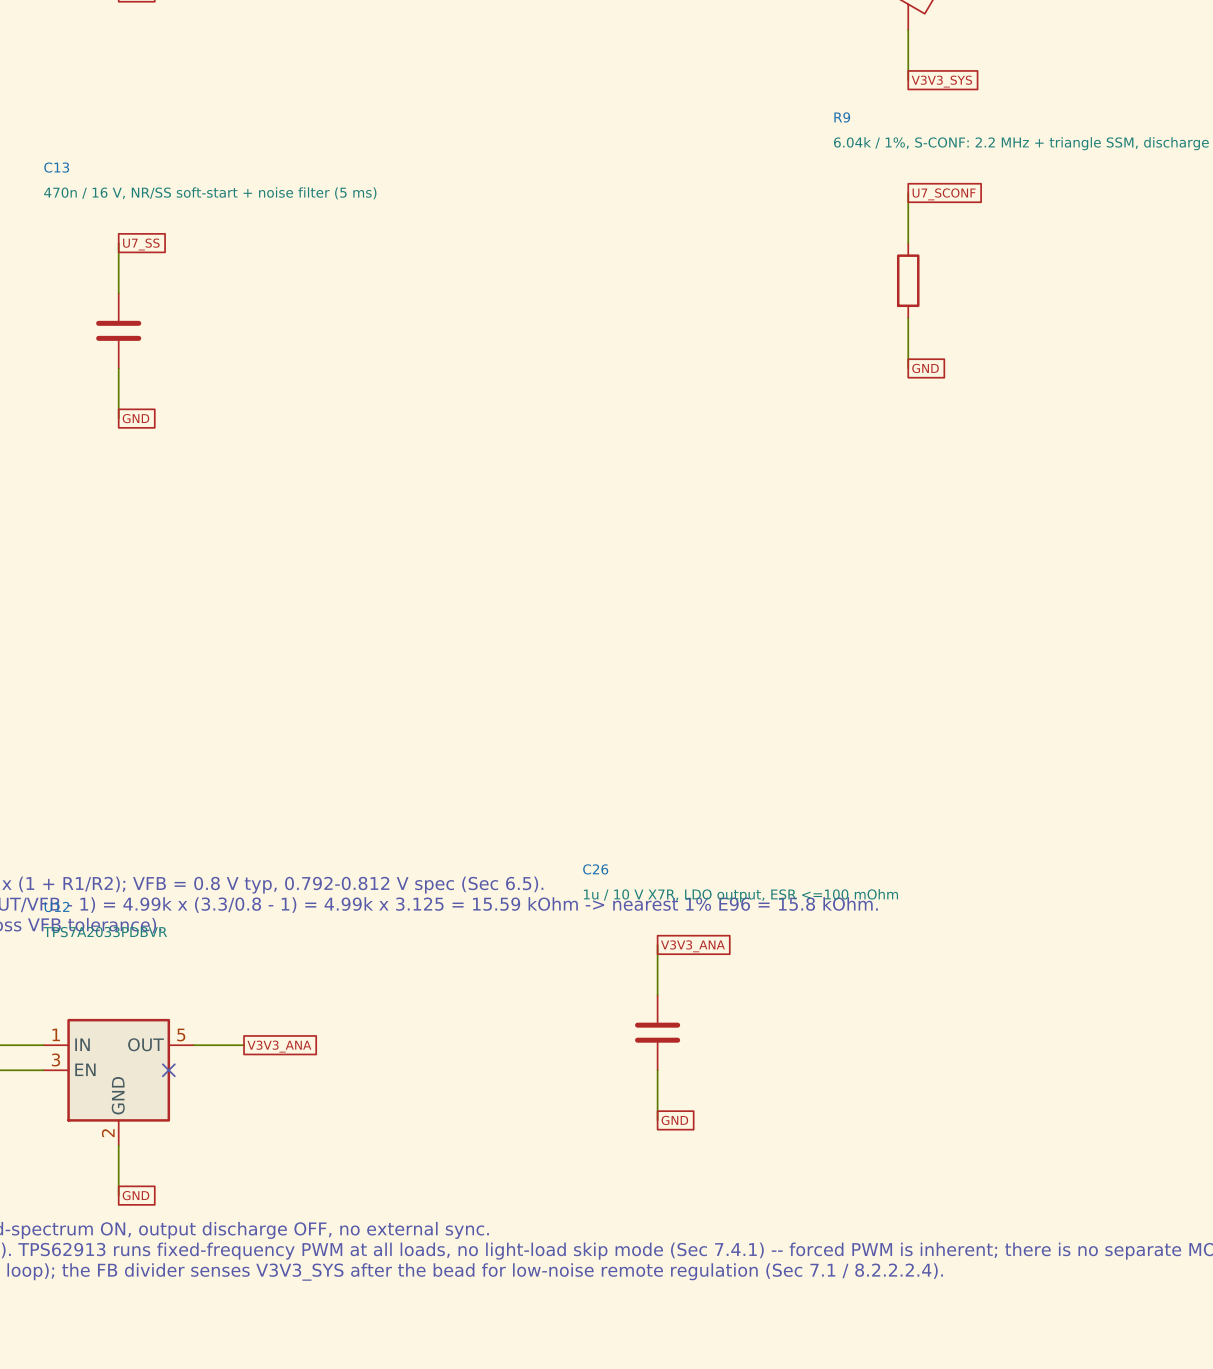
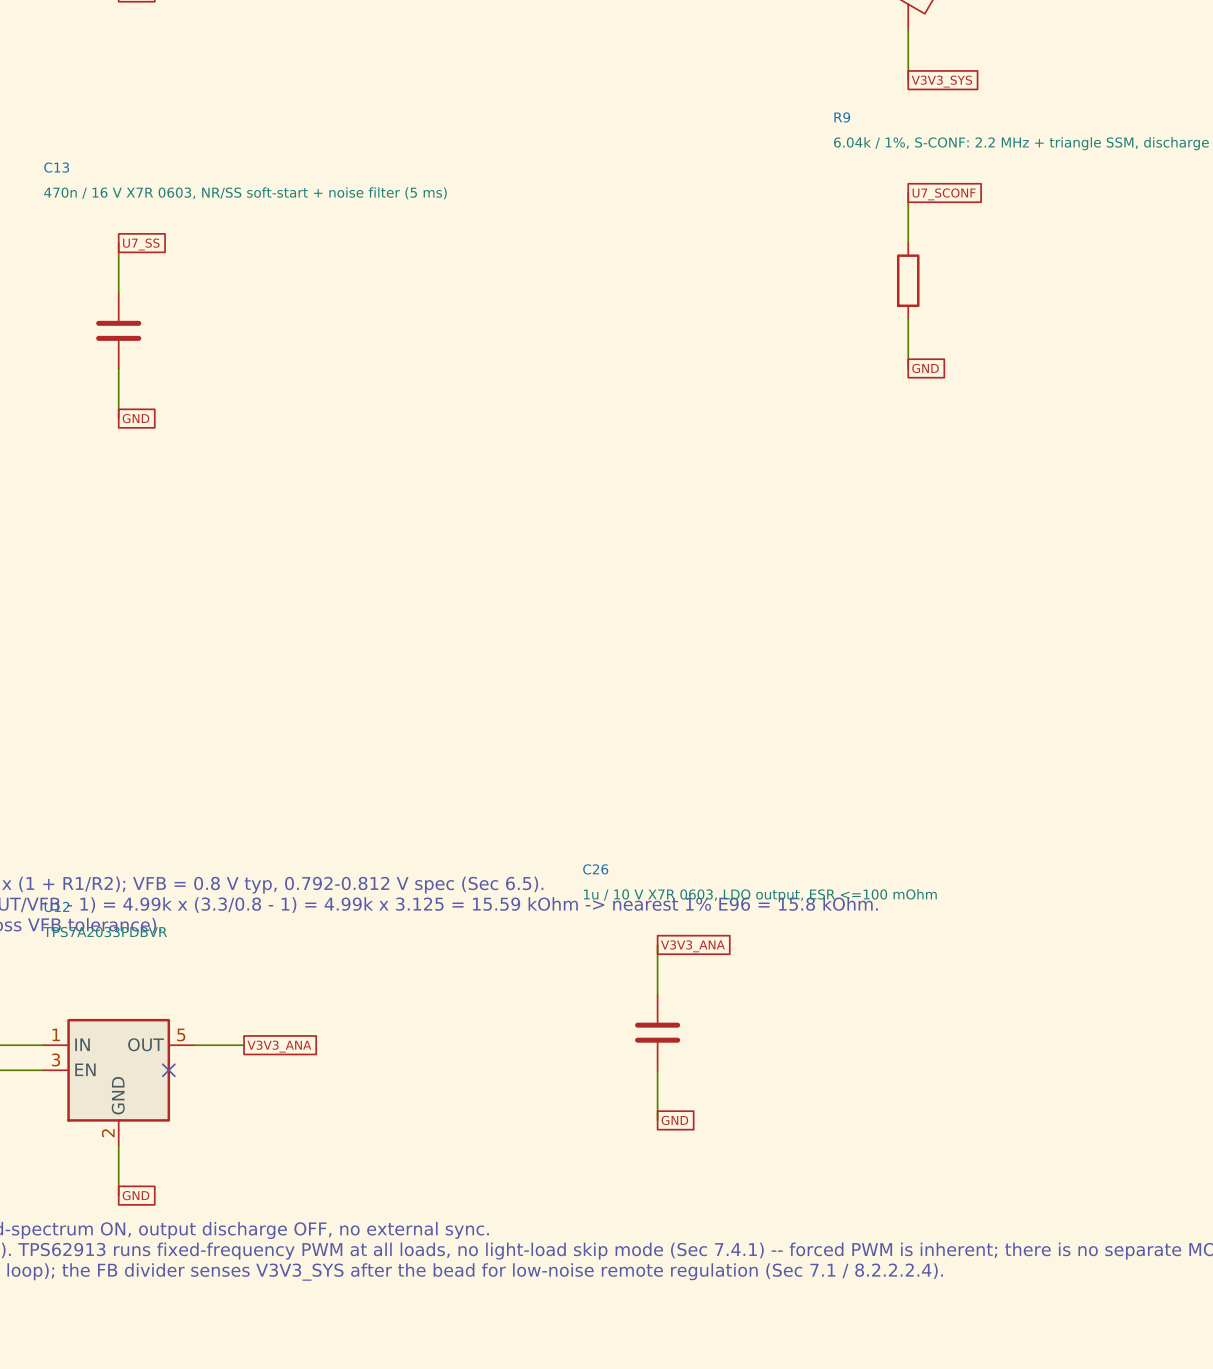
C13 value: 470n / 16 V, NR/SS soft-start + noise filter (5 ms) (210, 193) -> 470n / 16 V X7R 0603, NR/SS soft-start + noise filter (5 ms) (245, 193)
C26 value: 1u / 10 V X7R, LDO output, ESR <=100 mOhm (740, 895) -> 1u / 10 V X7R 0603, LDO output, ESR <=100 mOhm (760, 895)

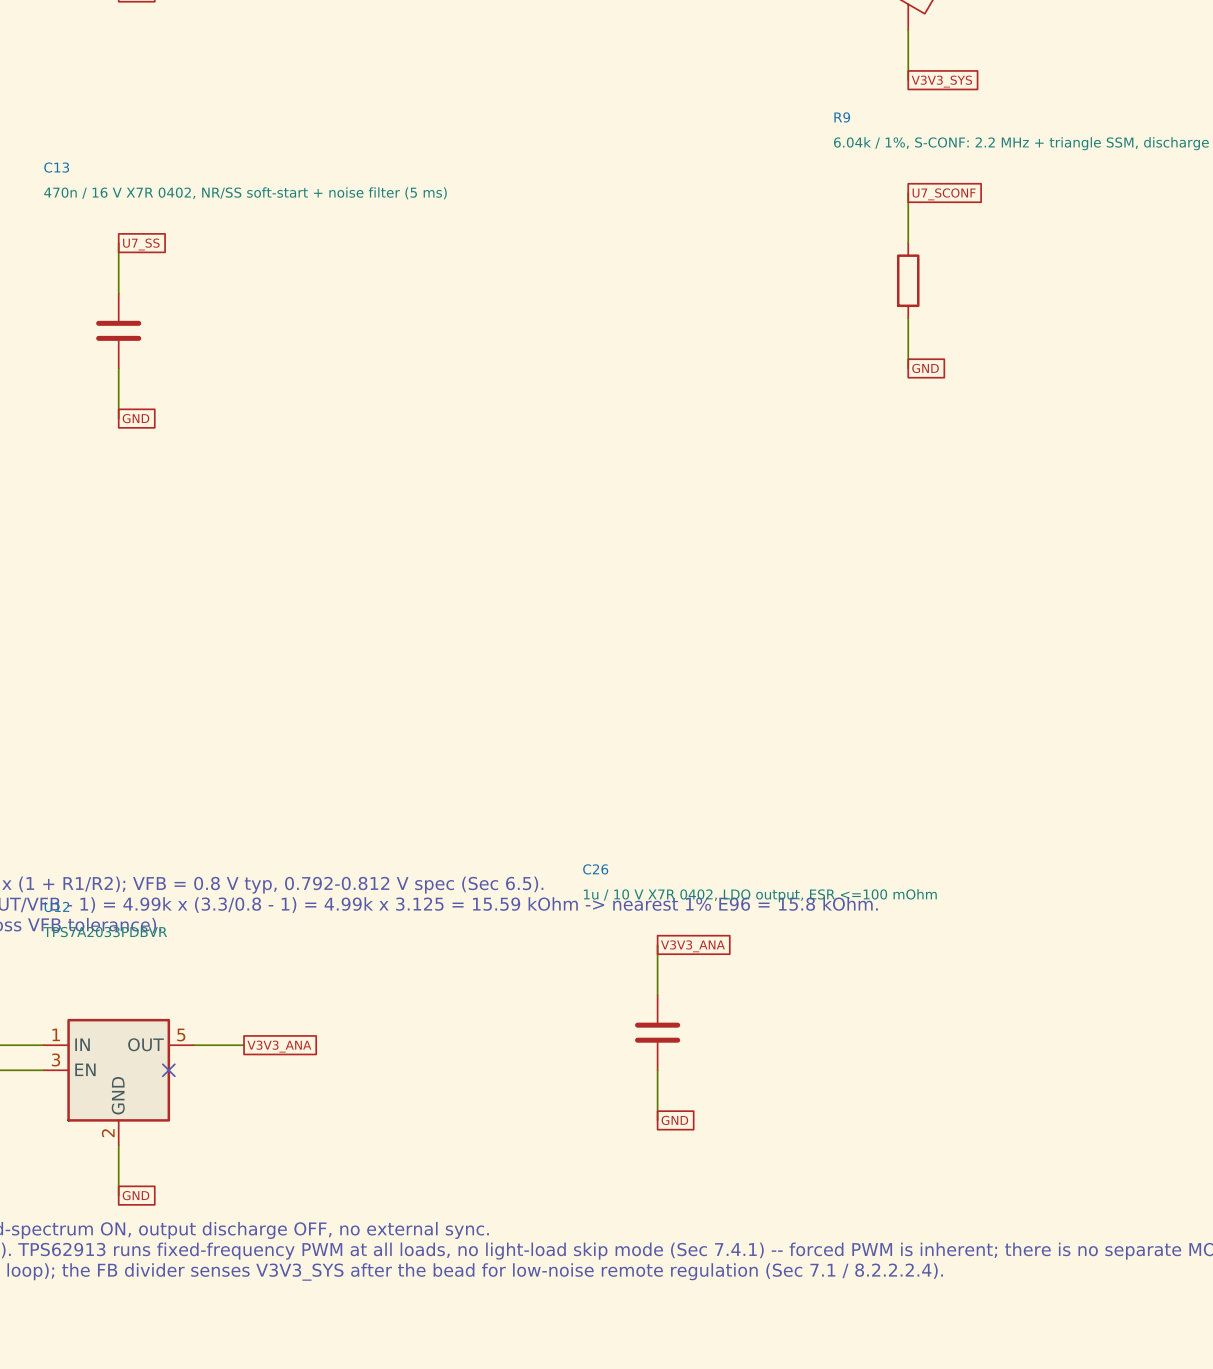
C13 value: 470n / 16 V X7R 0603, NR/SS soft-start + noise filter (5 ms) (245, 193) -> 470n / 16 V X7R 0402, NR/SS soft-start + noise filter (5 ms) (245, 193)
C26 value: 1u / 10 V X7R 0603, LDO output, ESR <=100 mOhm (760, 895) -> 1u / 10 V X7R 0402, LDO output, ESR <=100 mOhm (760, 895)

